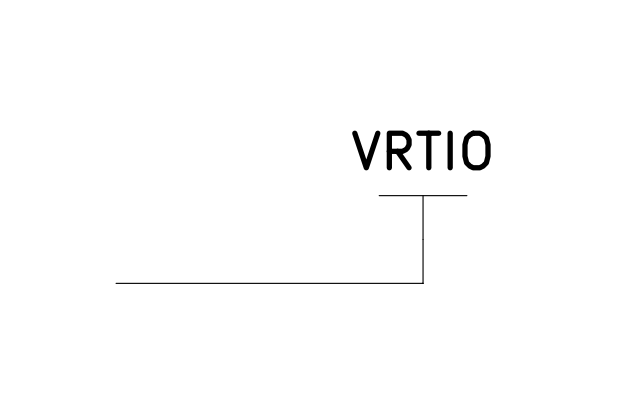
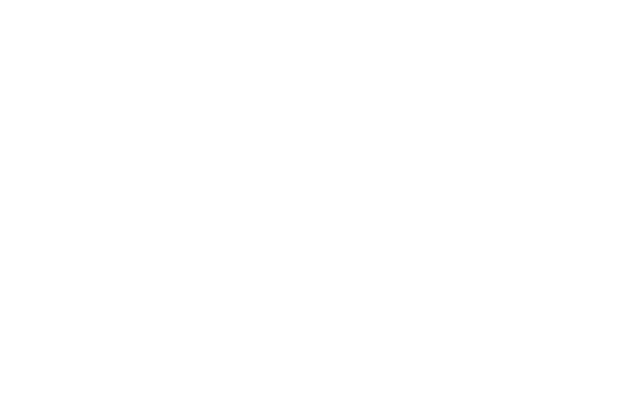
power symbol: VRTIO (423, 217) -> none
wire: (423, 239) (423, 283) (116, 283) -> none

